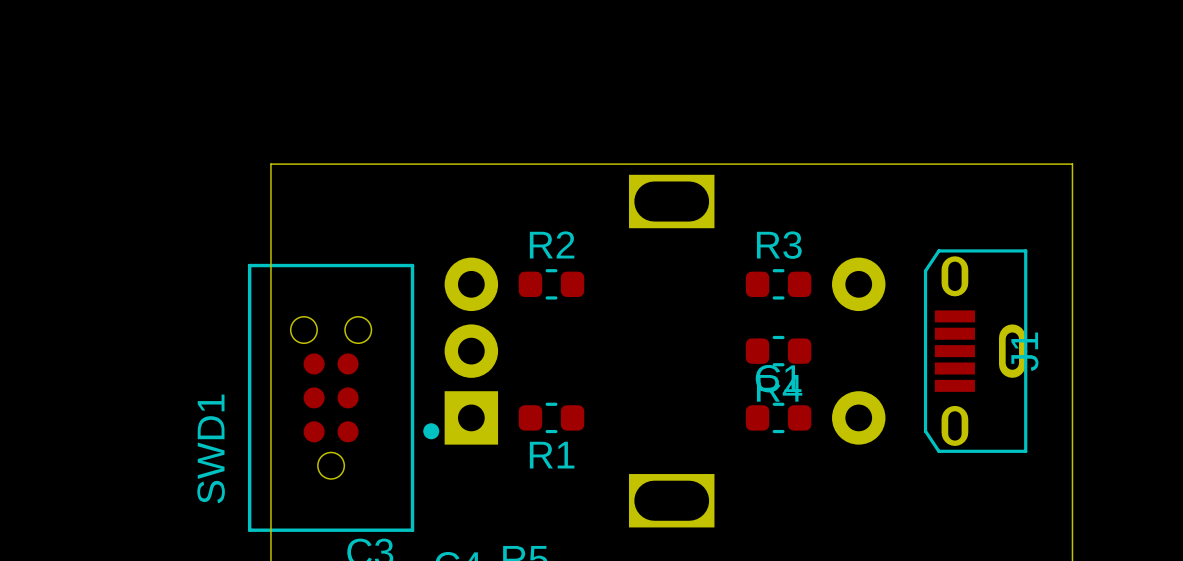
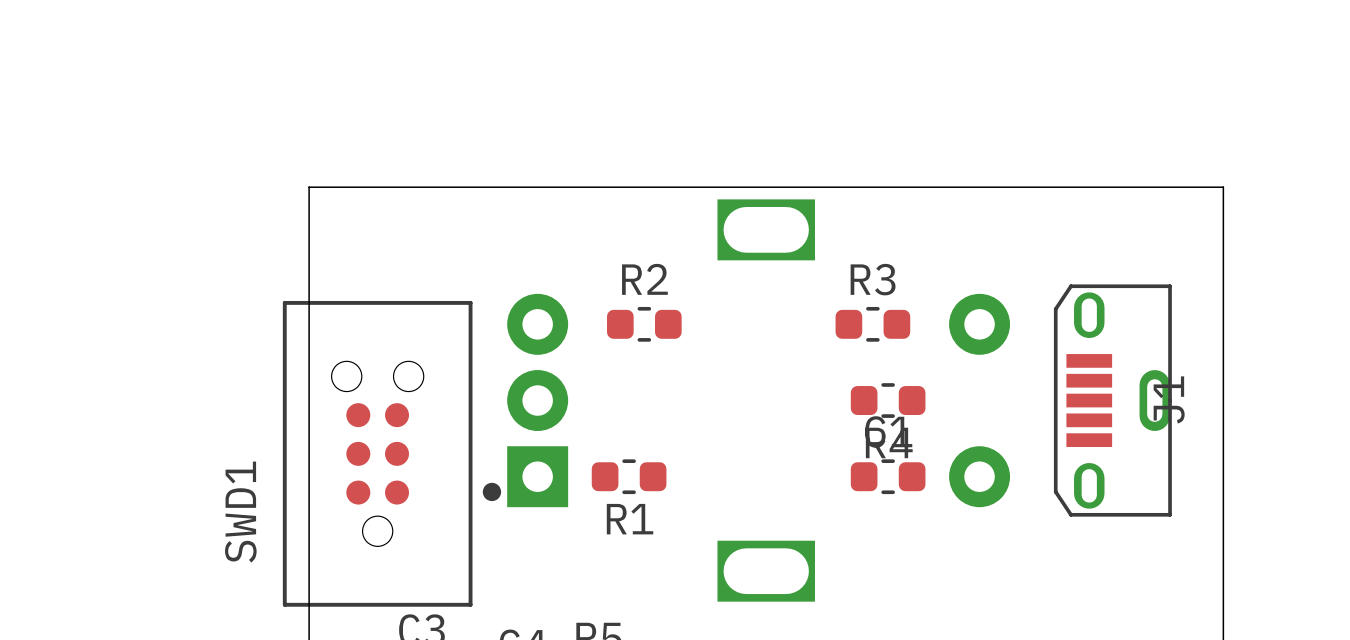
R2 position: (551, 284) -> (644, 324)
R3 position: (778, 284) -> (872, 324)

